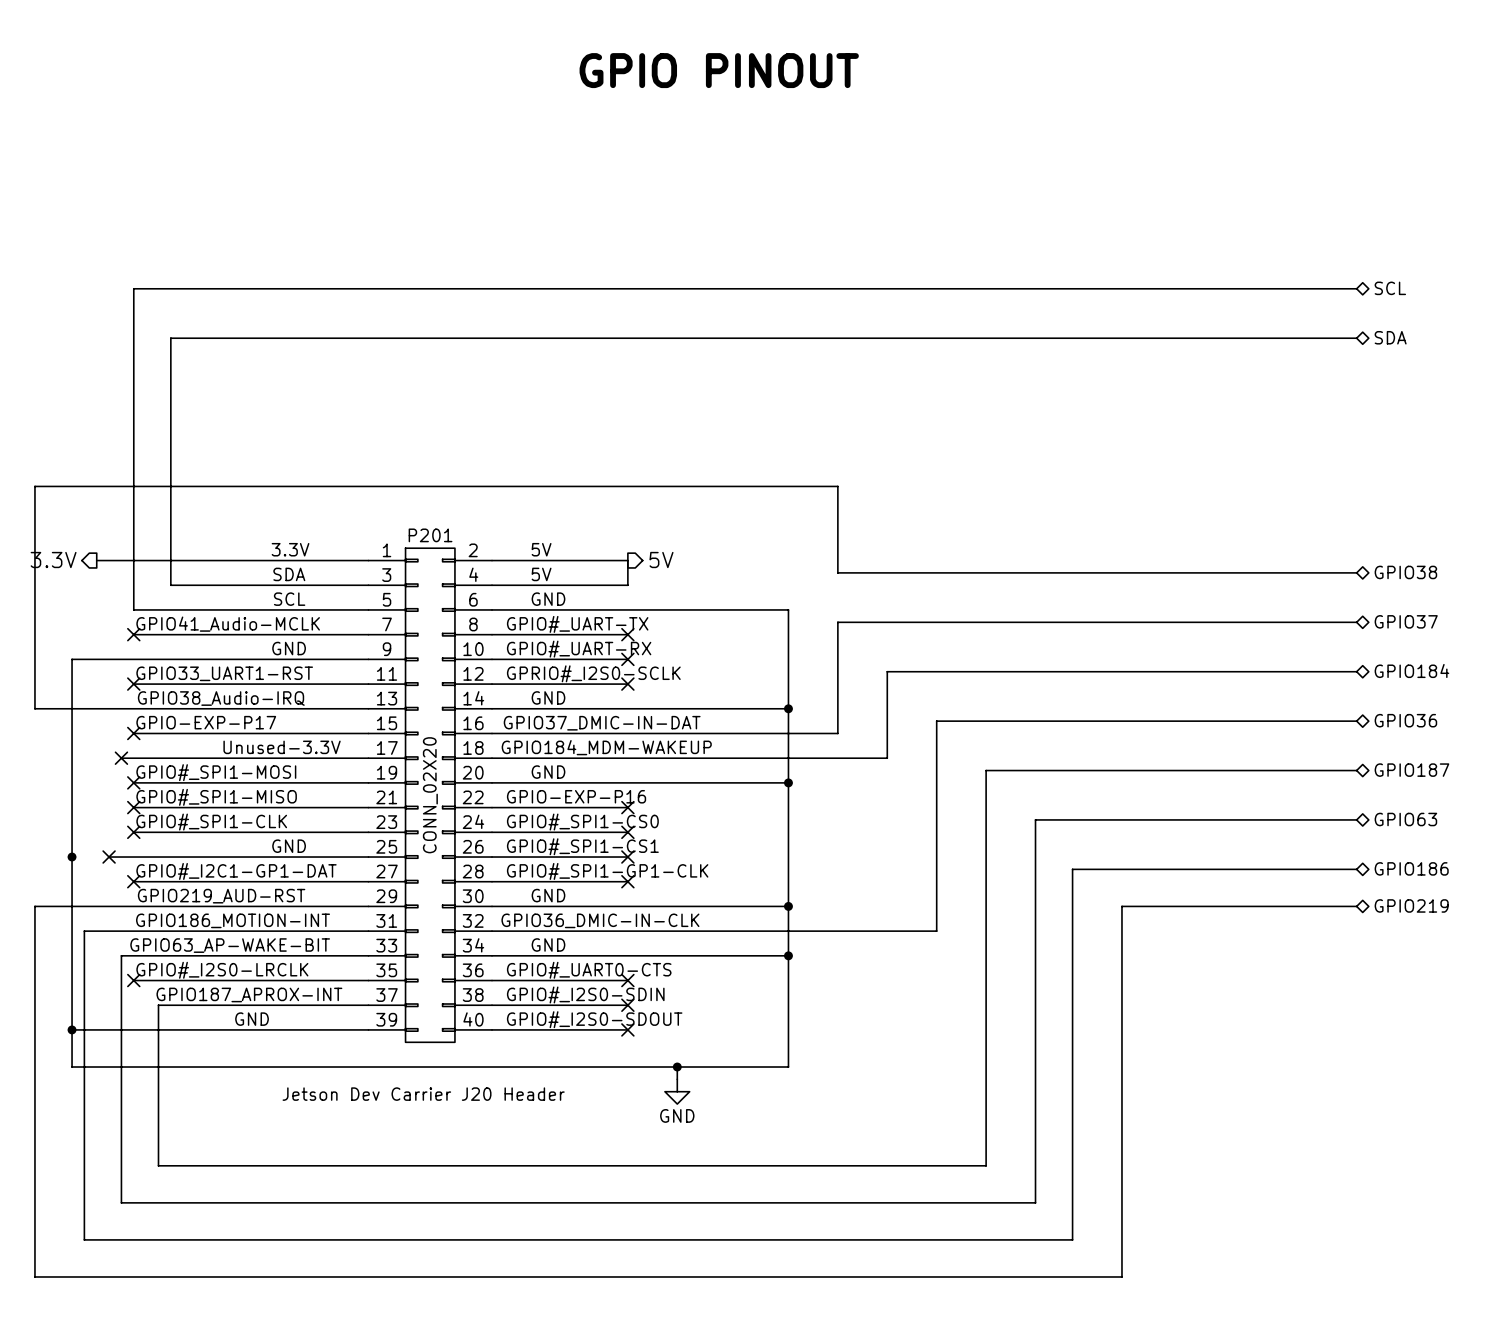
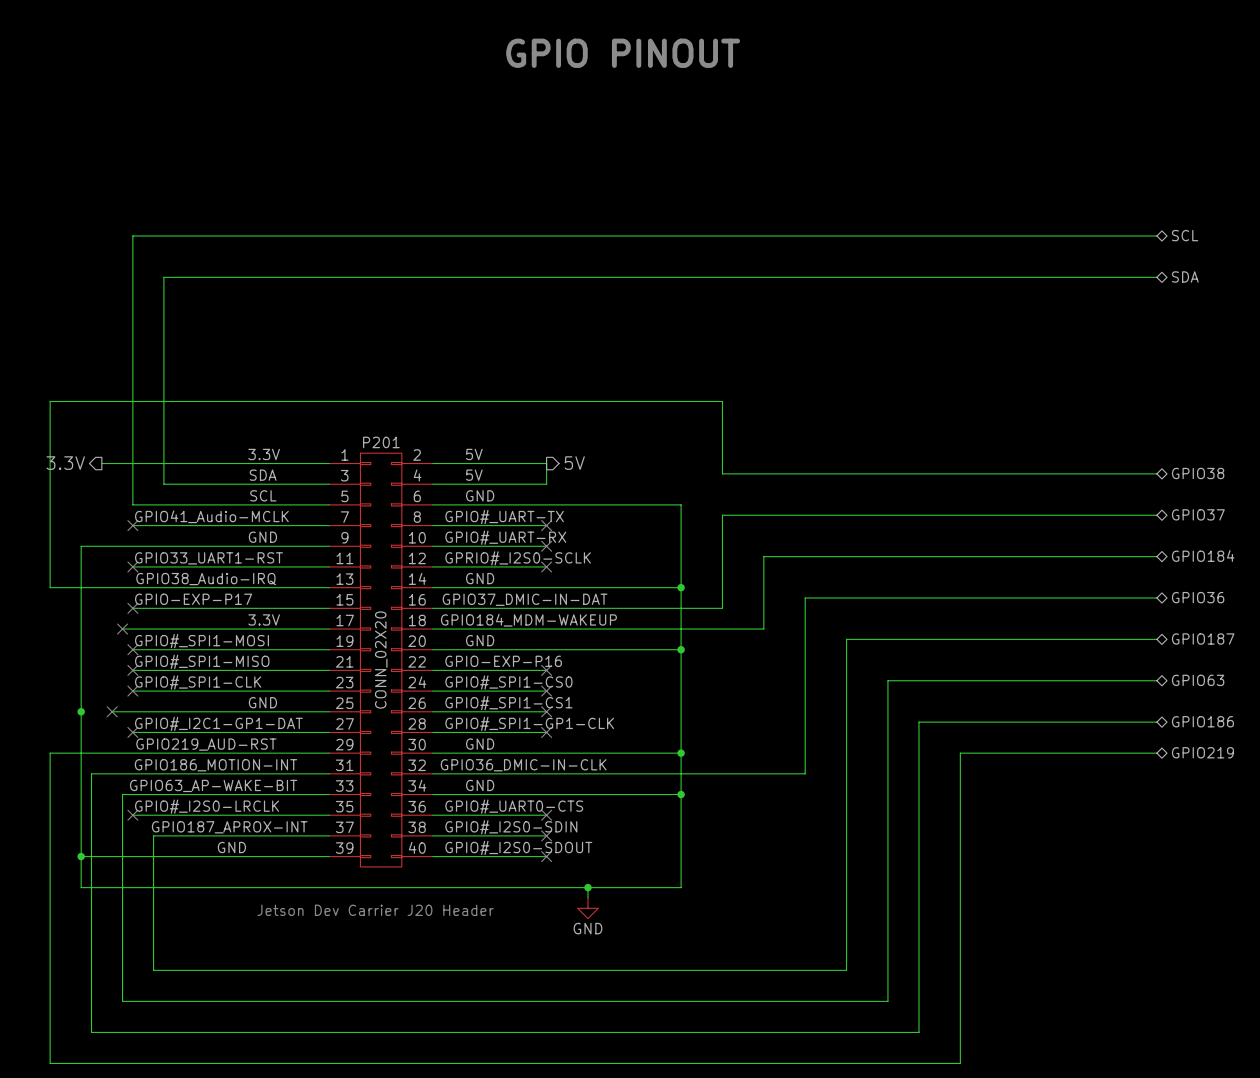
label: Unused-3.3V (282, 747) -> none
label: none -> 3.3V (264, 619)

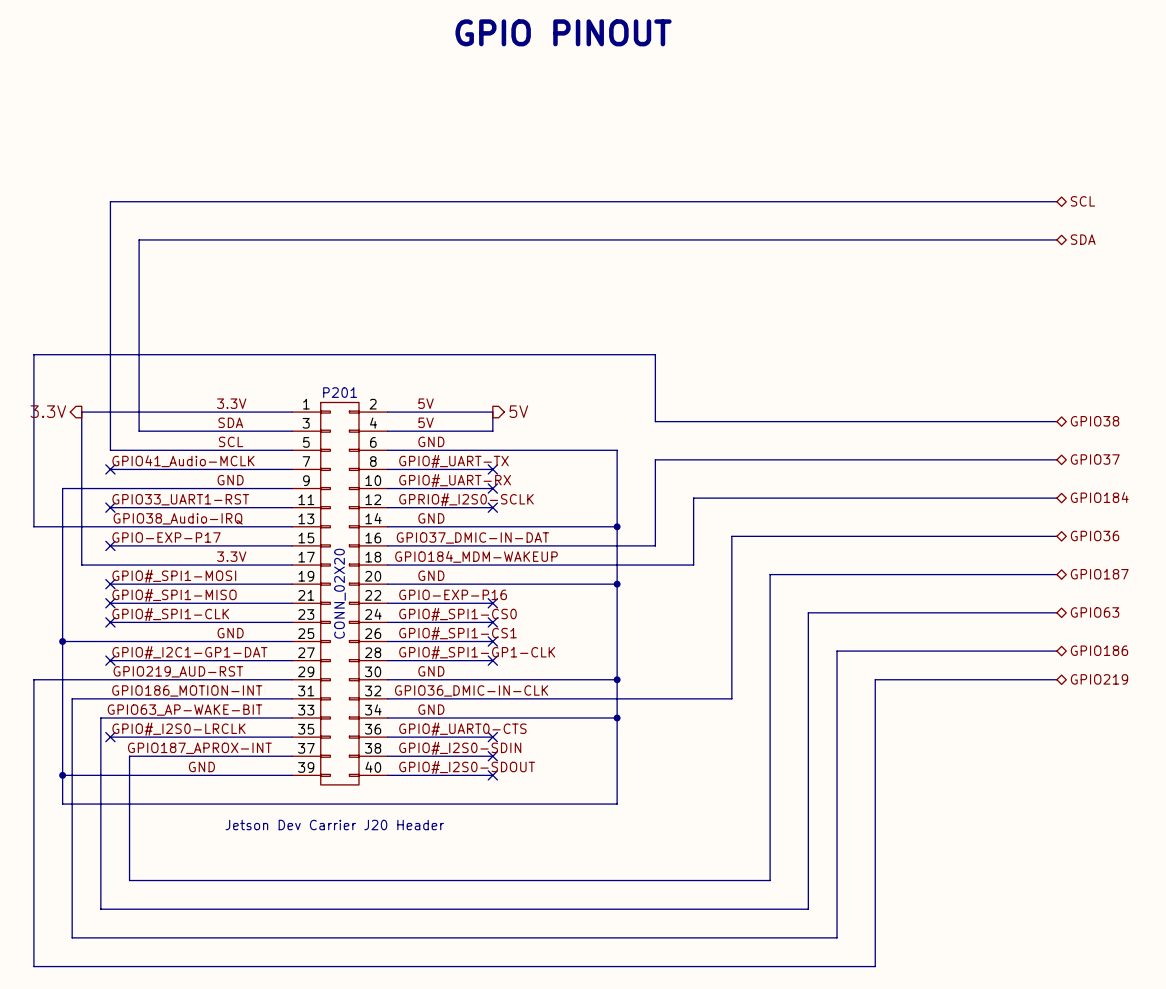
wire: none -> (81, 412) (81, 565) (100, 565)
no-connect mark: (122, 629) -> none
wire: none -> (62, 641) (91, 641)
no-connect mark: (112, 711) -> none
wire: (587, 887) (587, 897) -> none
junction: (587, 887) -> none
power symbol: GND (587, 908) -> none

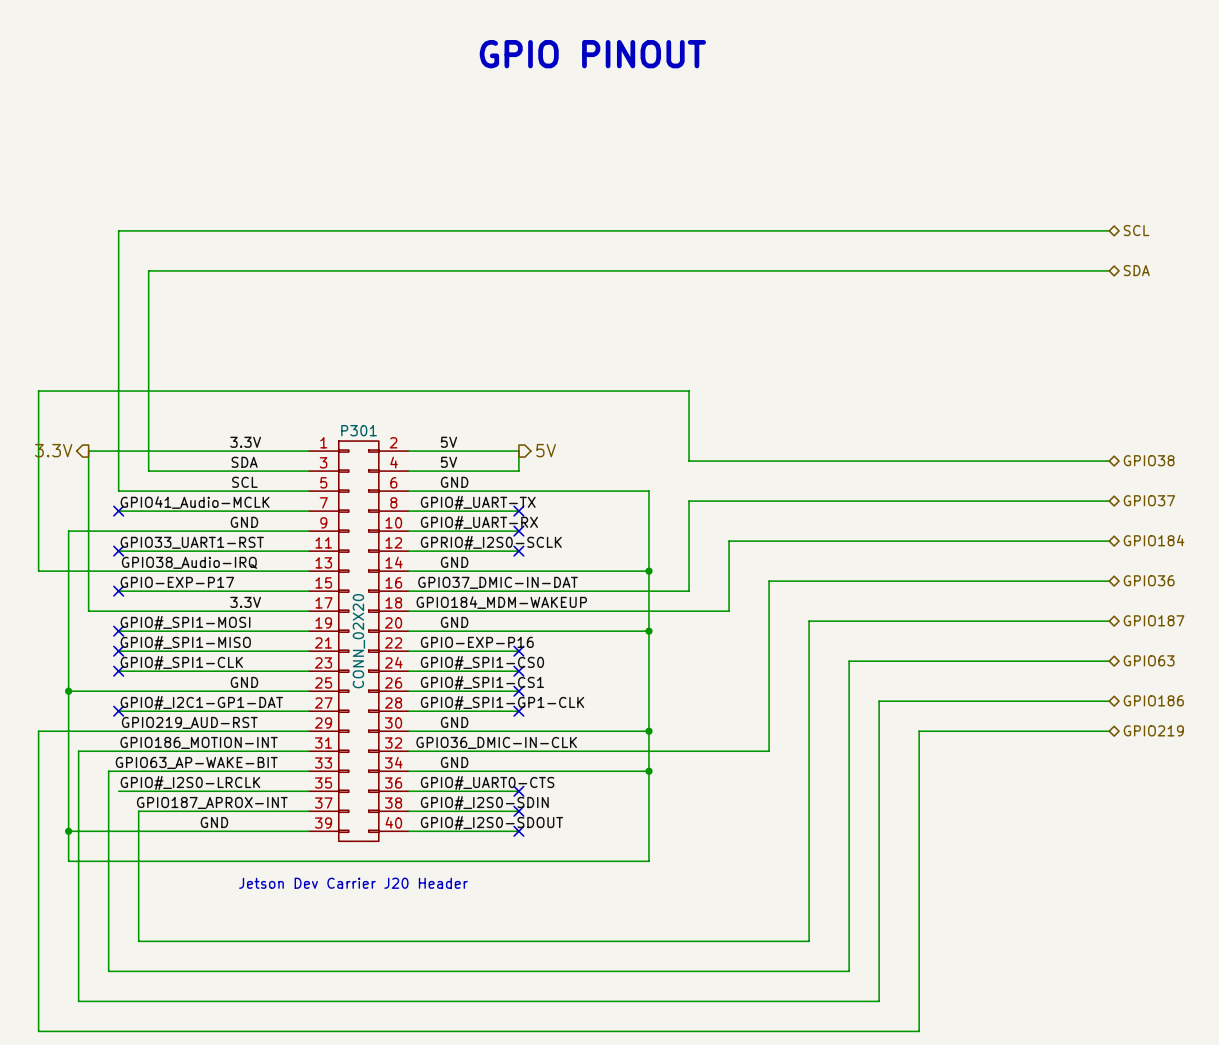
P201 name: P201 (340, 392) -> P301 (359, 430)
no-connect mark: (110, 737) -> none

